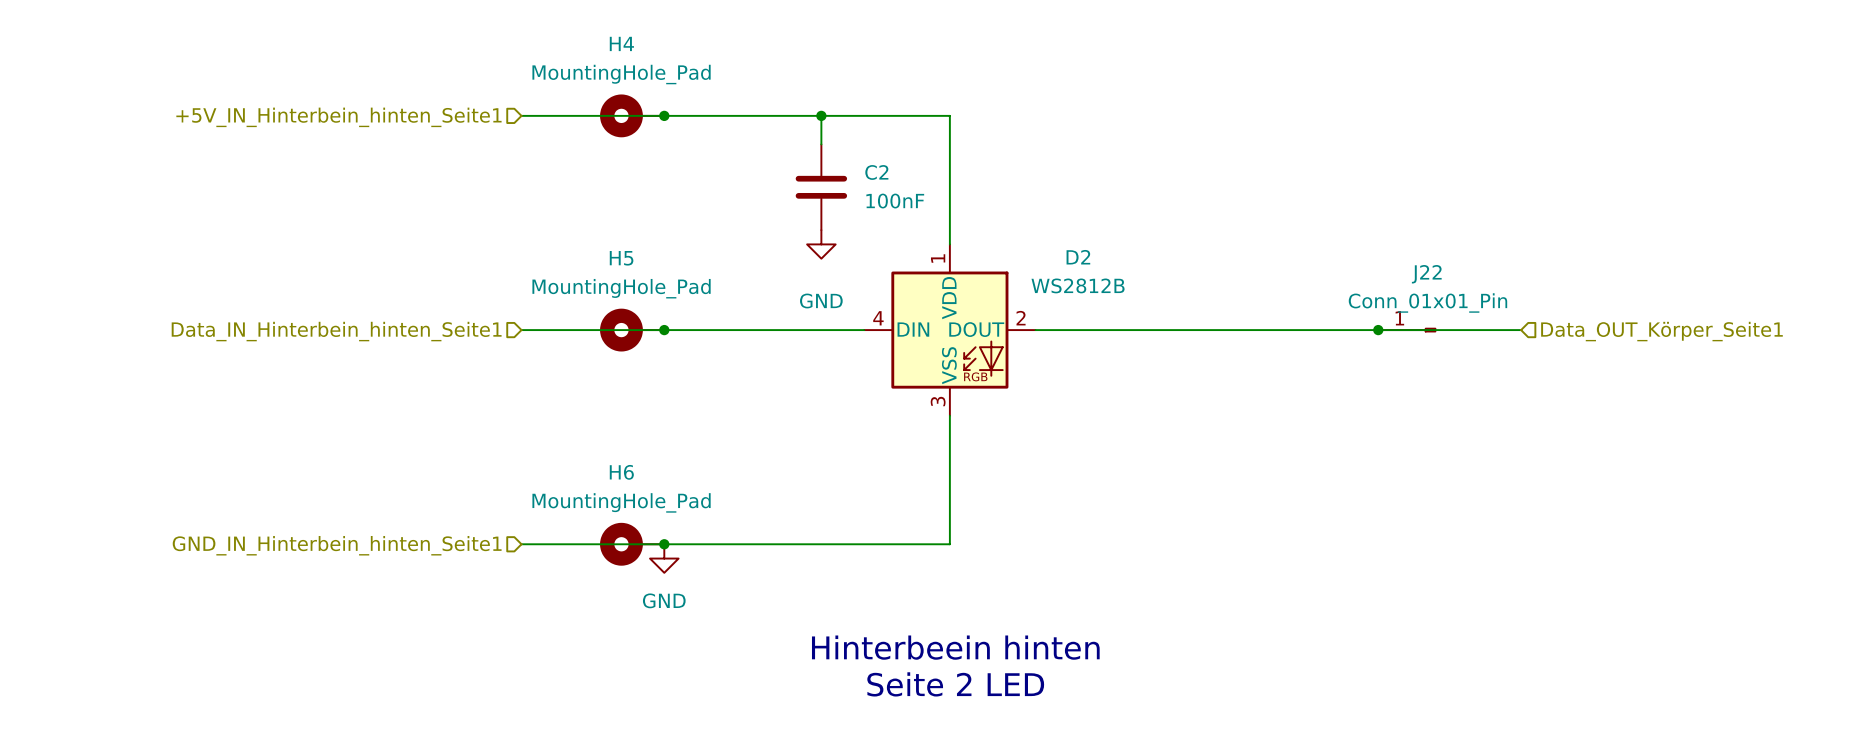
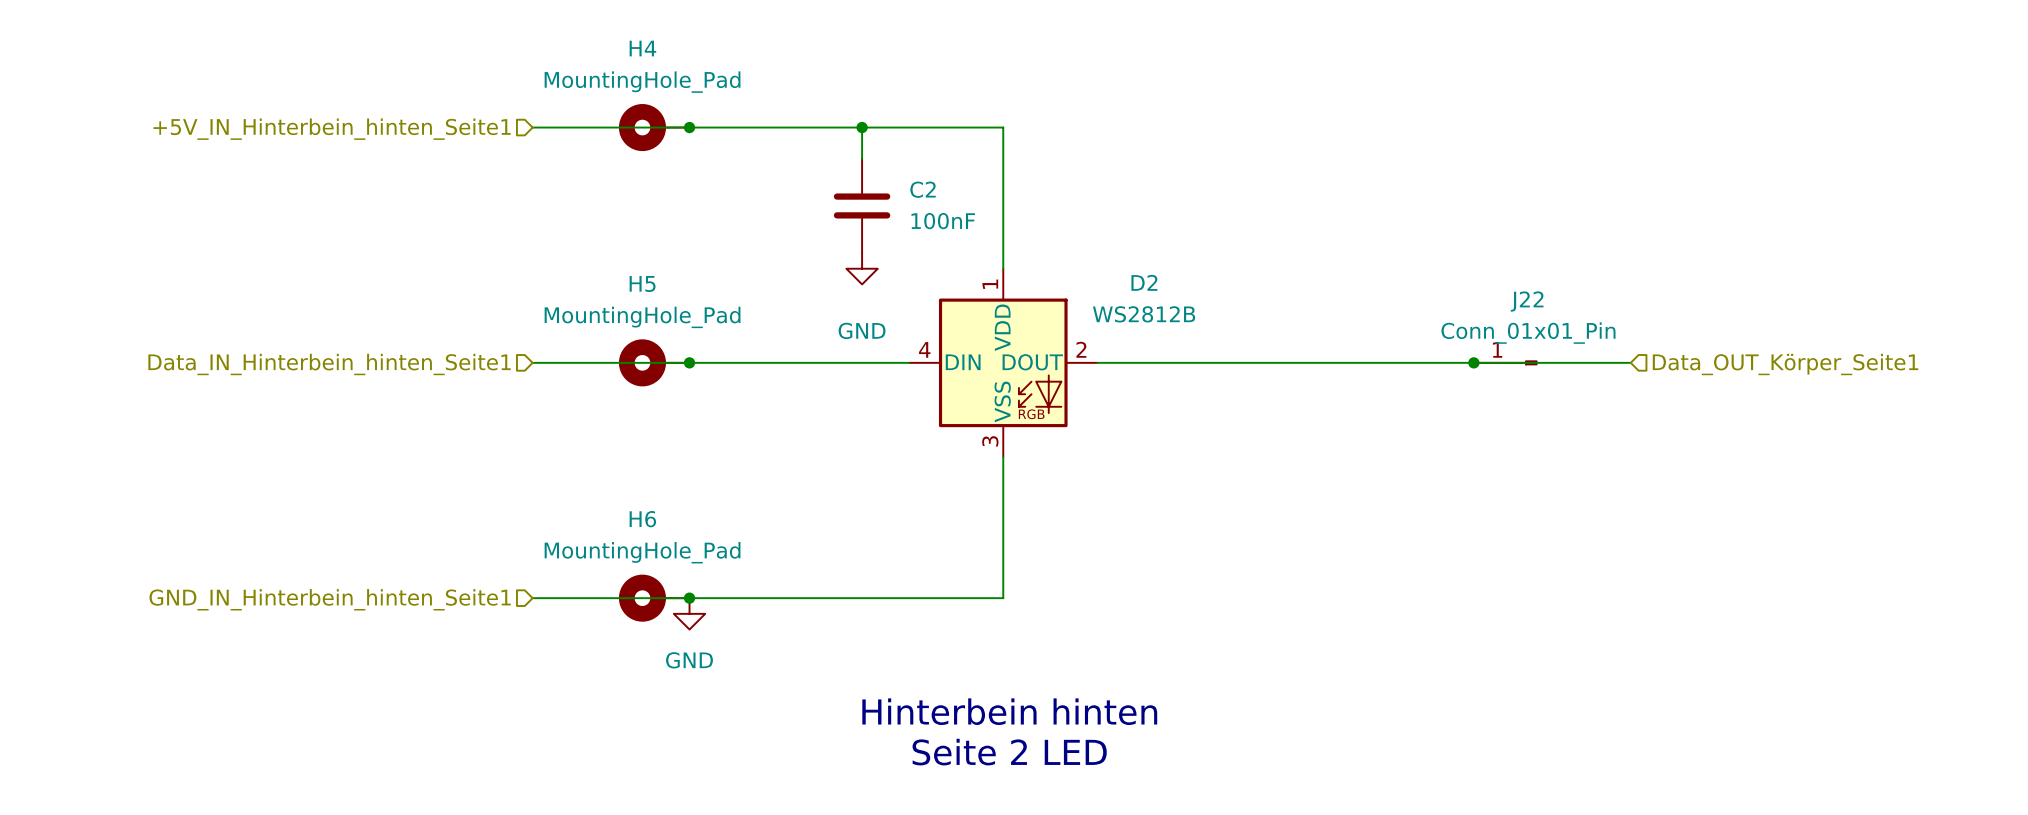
text: Hinterbeein hinten (955, 647) -> Hinterbein hinten (1009, 711)

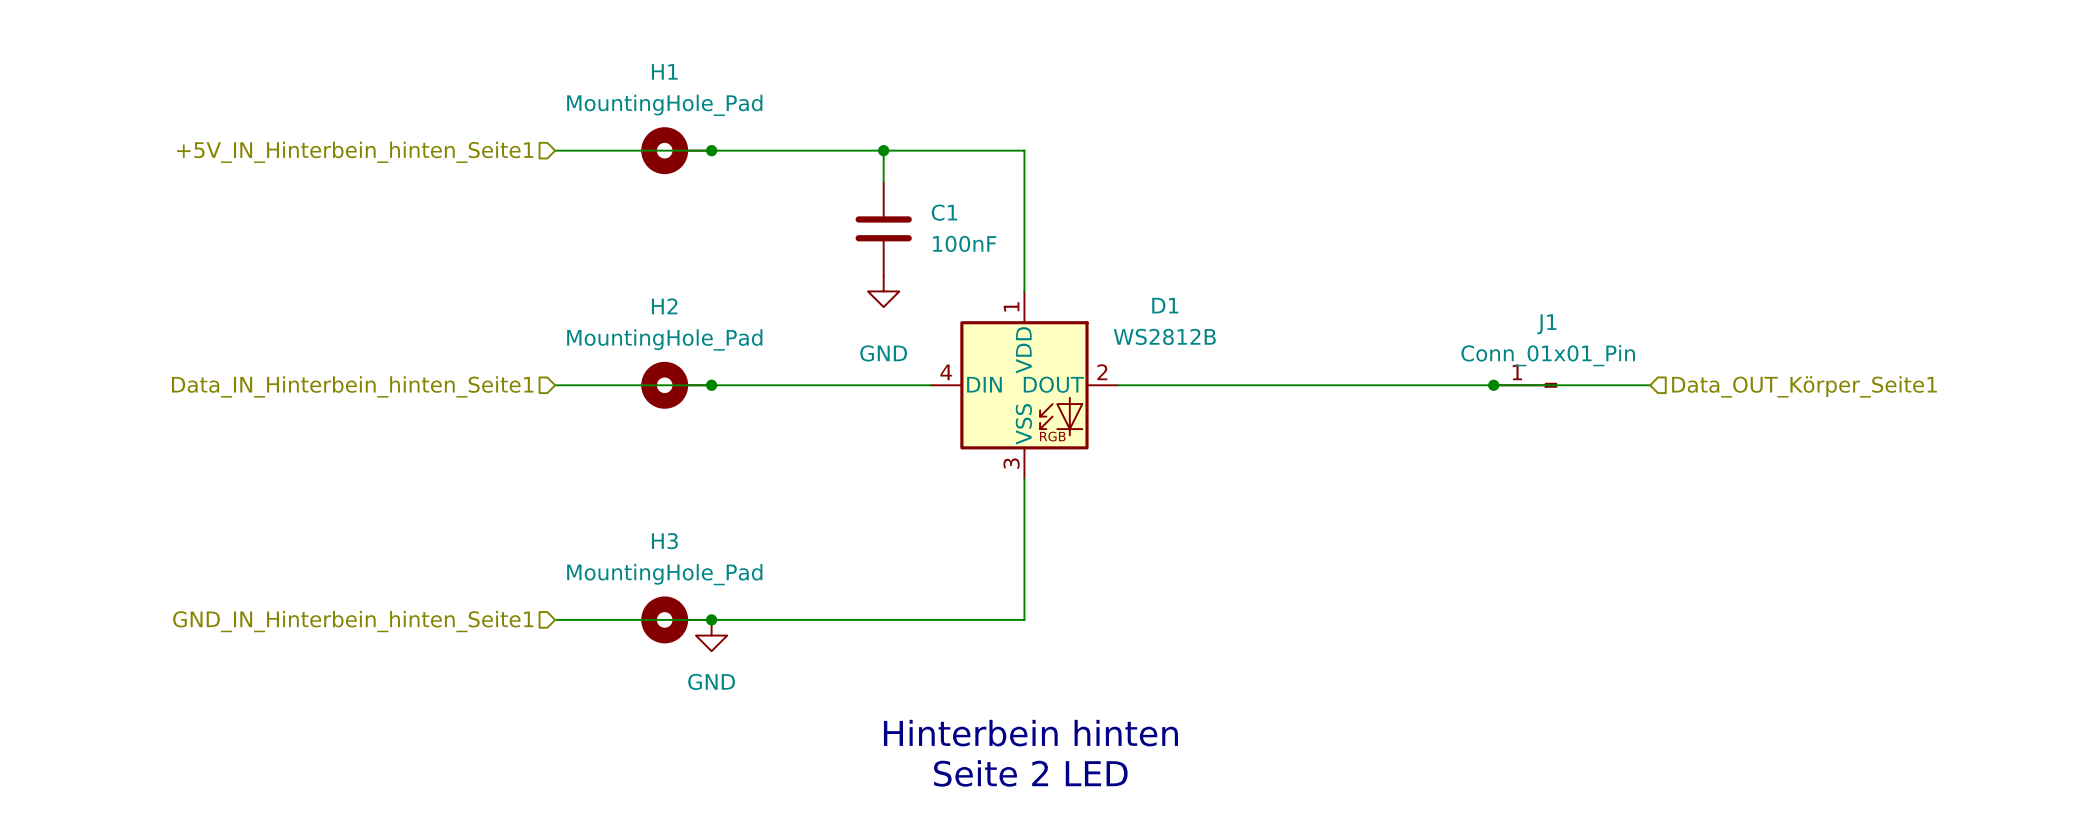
H4 name: H4 (642, 48) -> H1 (664, 71)
C2 name: C2 (923, 189) -> C1 (944, 212)
D2 name: D2 (1144, 282) -> D1 (1165, 305)
H5 name: H5 (642, 283) -> H2 (664, 306)
J22 name: J22 (1527, 301) -> J1 (1546, 324)
H6 name: H6 (642, 519) -> H3 (664, 541)

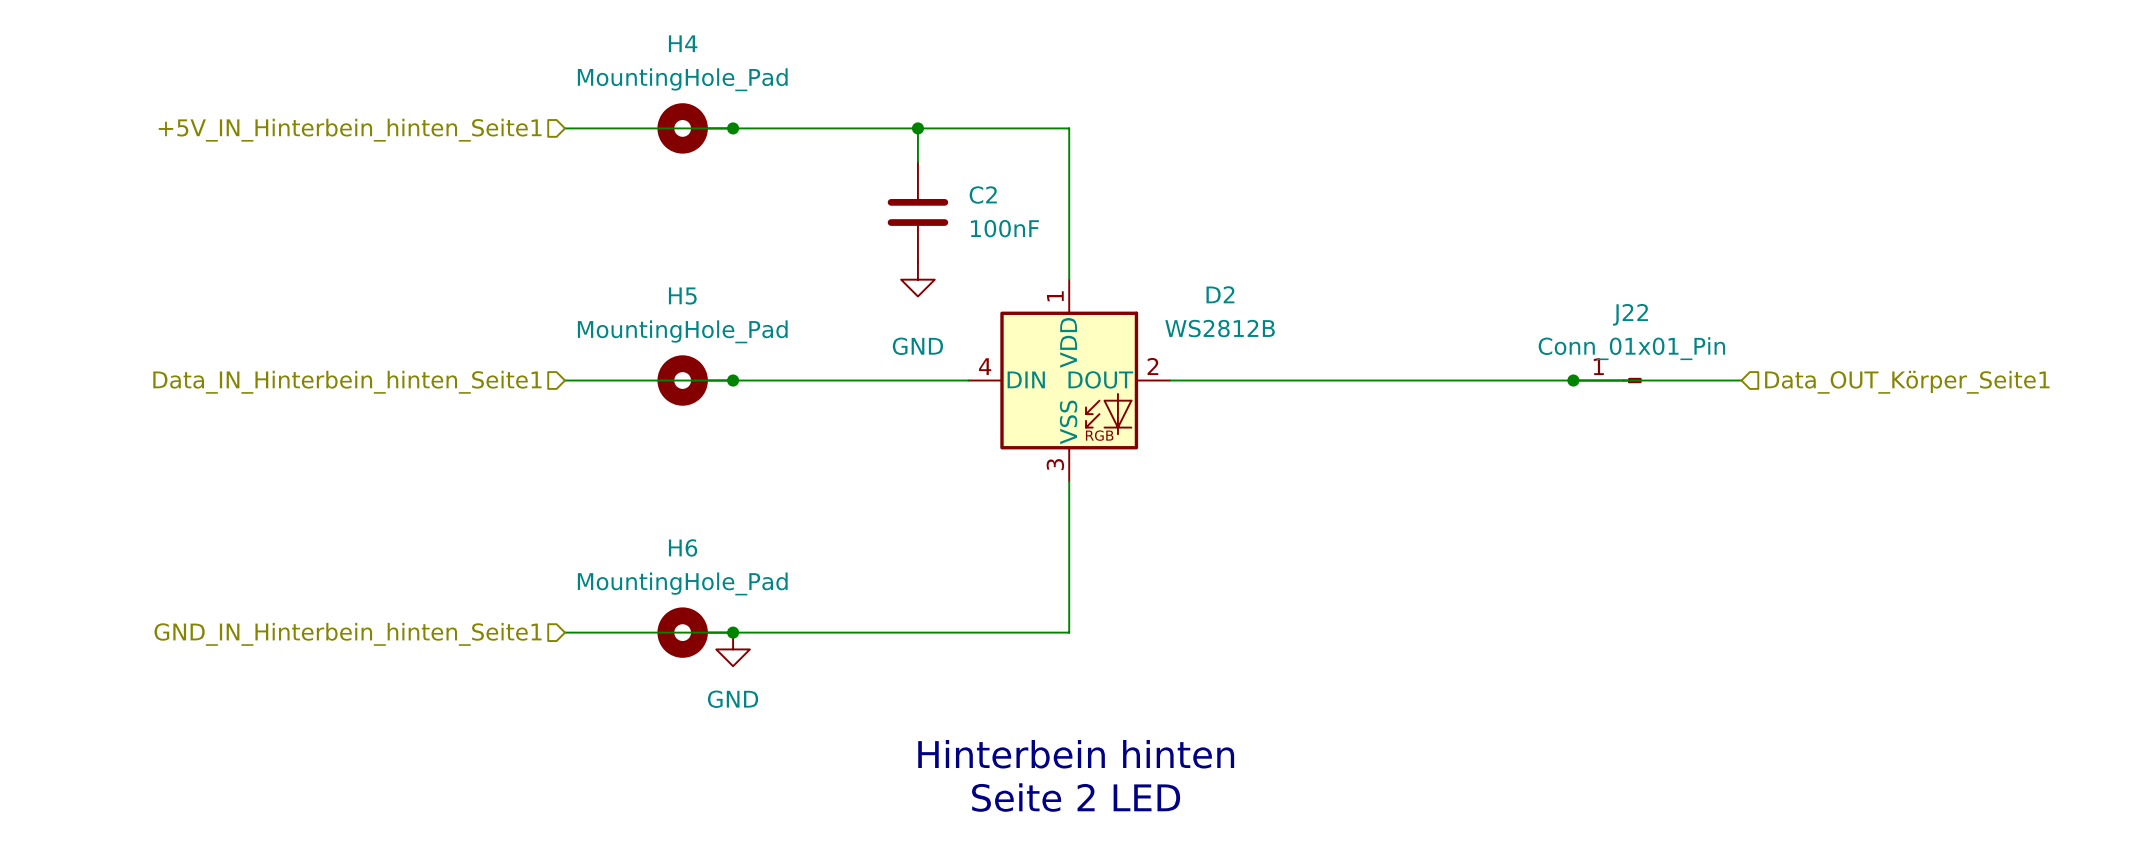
H1 name: H1 (664, 71) -> H4 (683, 43)
C1 name: C1 (944, 212) -> C2 (983, 195)
D1 name: D1 (1165, 305) -> D2 (1220, 294)
H2 name: H2 (664, 306) -> H5 (682, 296)
J1 name: J1 (1546, 324) -> J22 (1630, 314)
H3 name: H3 (664, 541) -> H6 (683, 547)

